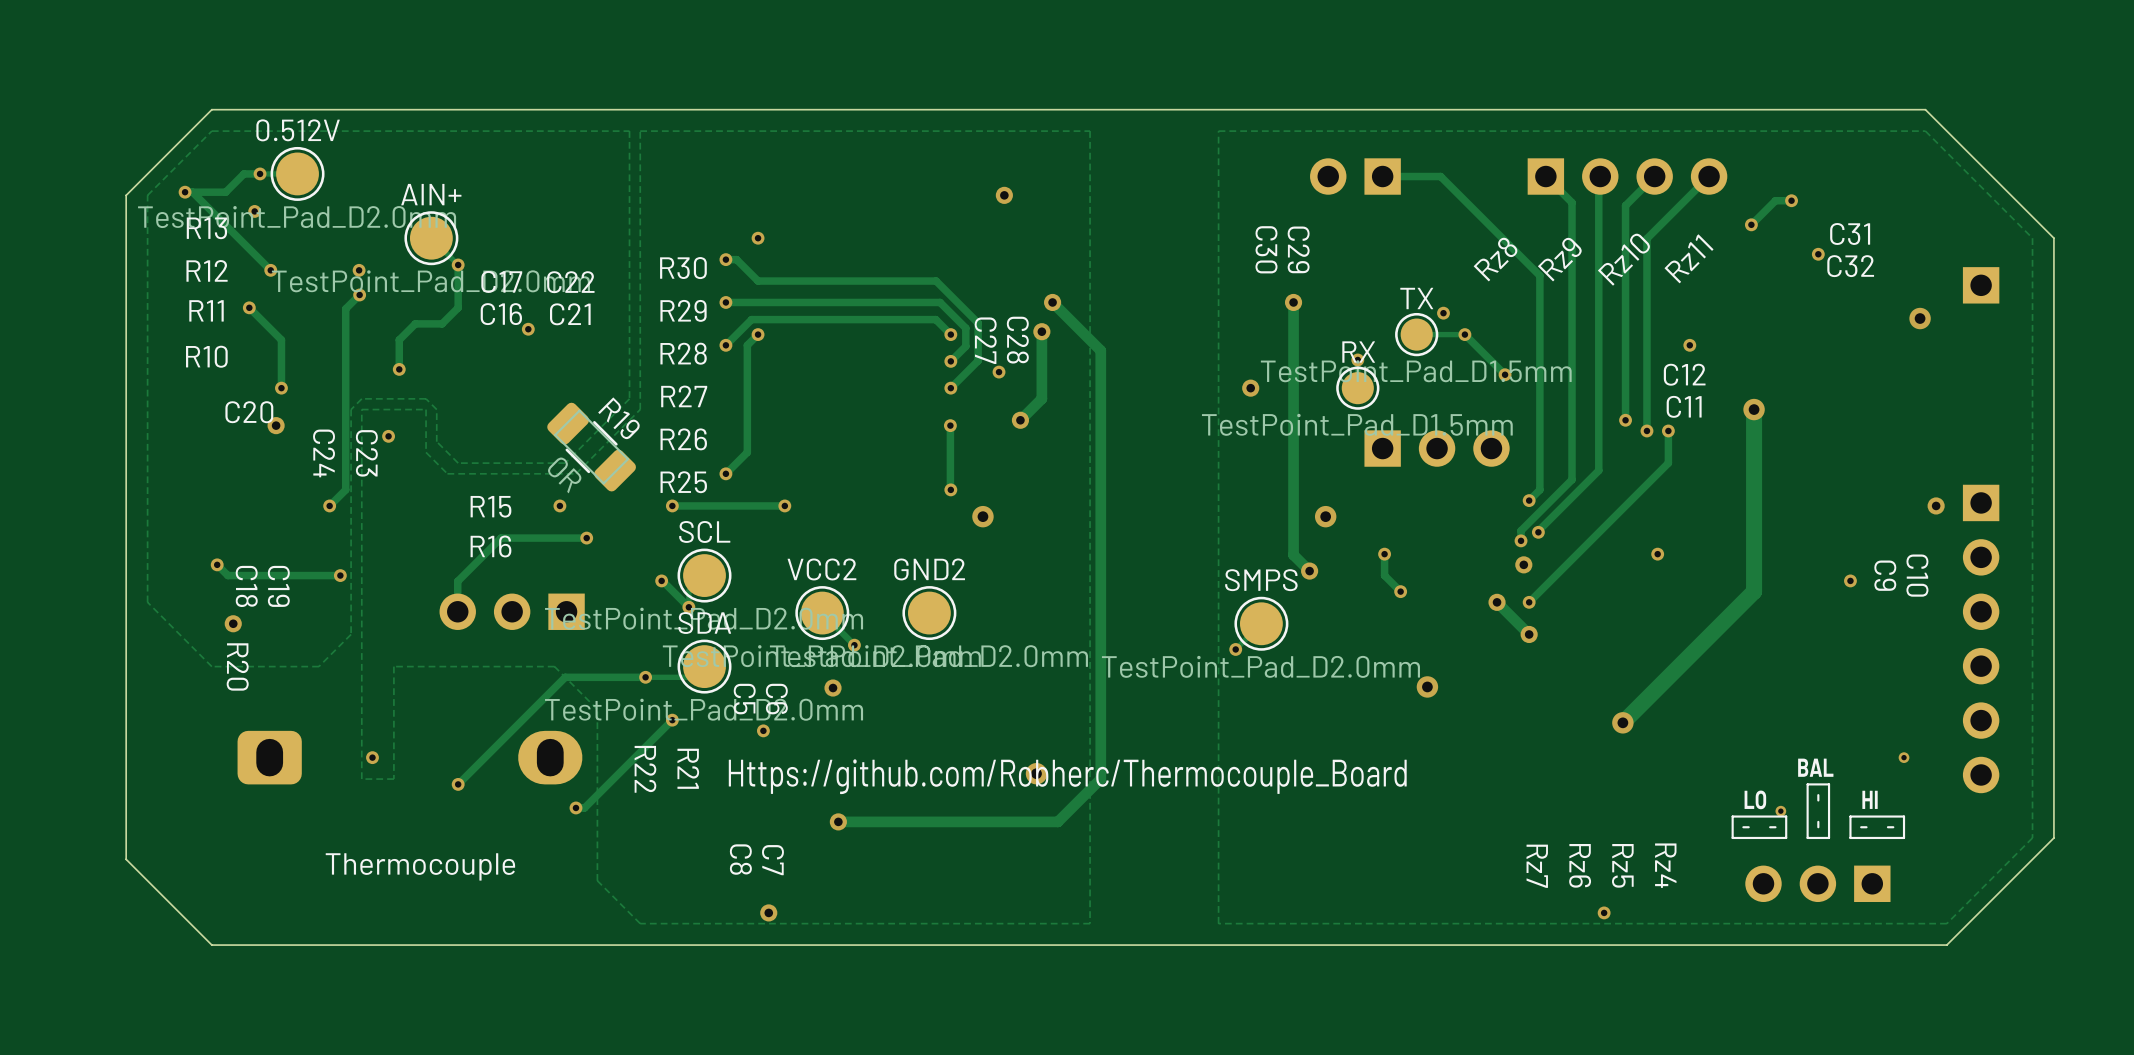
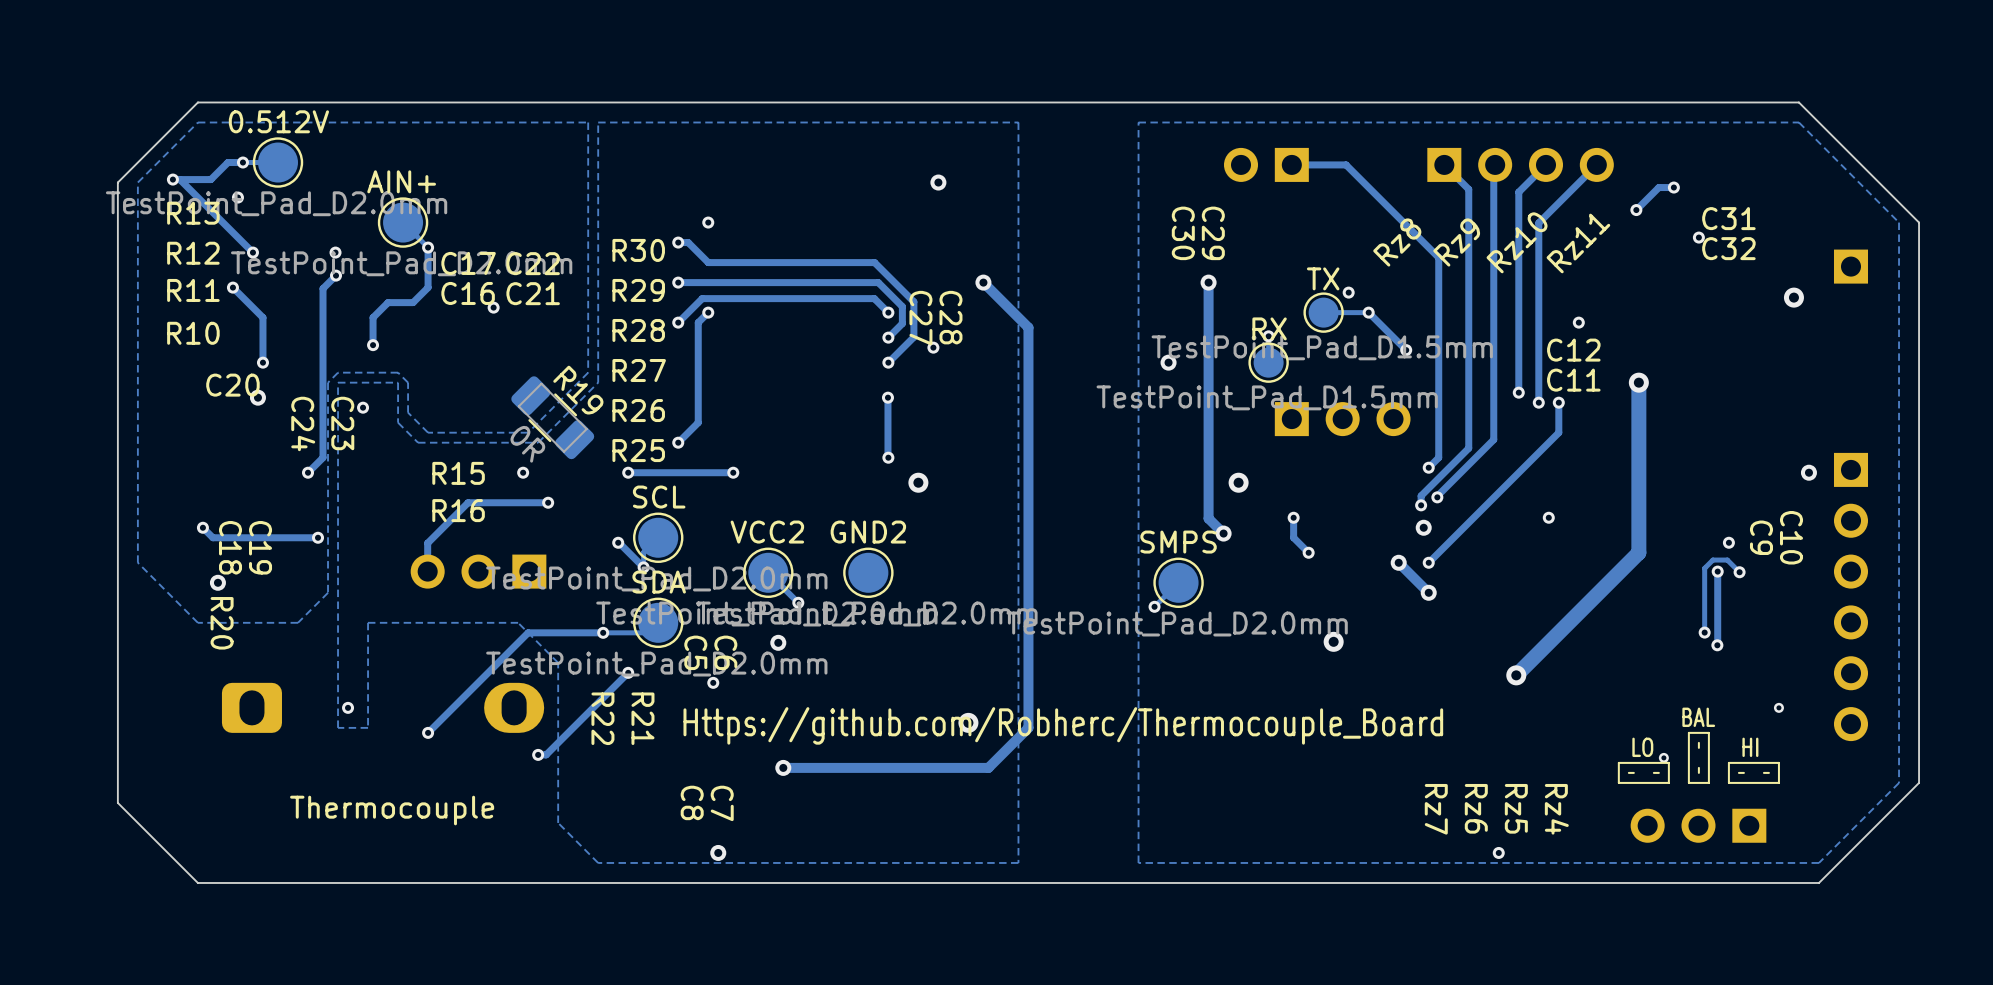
track: (1041, 331) (1041, 398) (1020, 420) -> none
via: (1041, 331) -> none
via: (1020, 420) -> none
track: none -> (1717, 571) (1717, 644)
via: none -> (1717, 571)
track: none -> (1739, 572) (1727, 560) (1712, 560) (1704, 568) (1704, 632)
via: none -> (1739, 572)
via: none -> (1704, 632)
via: none -> (1717, 645)

